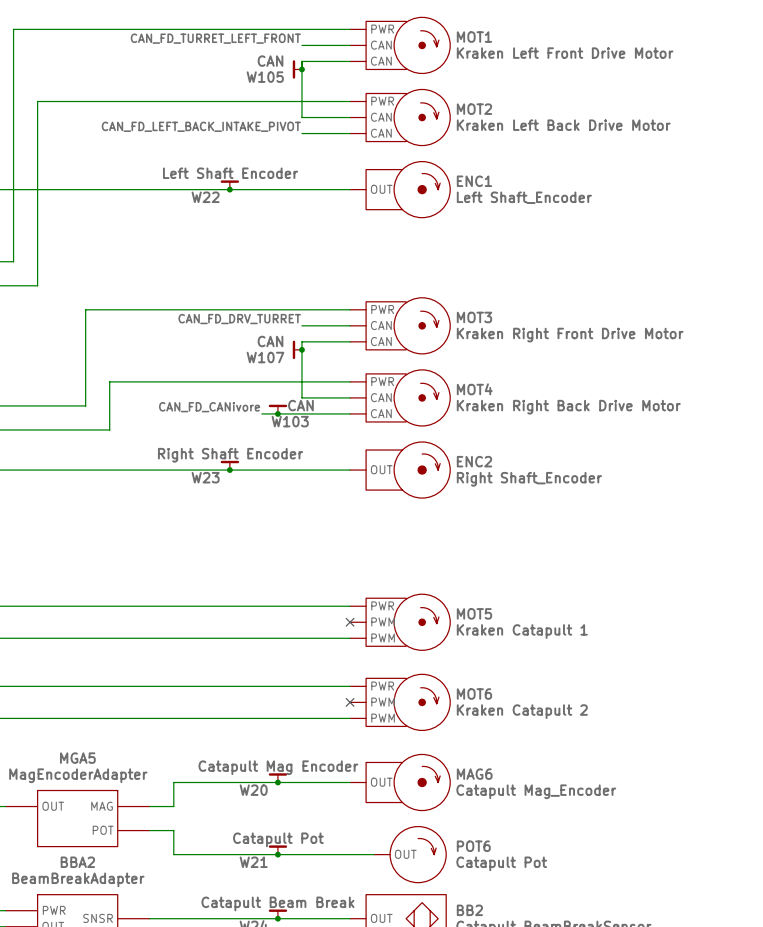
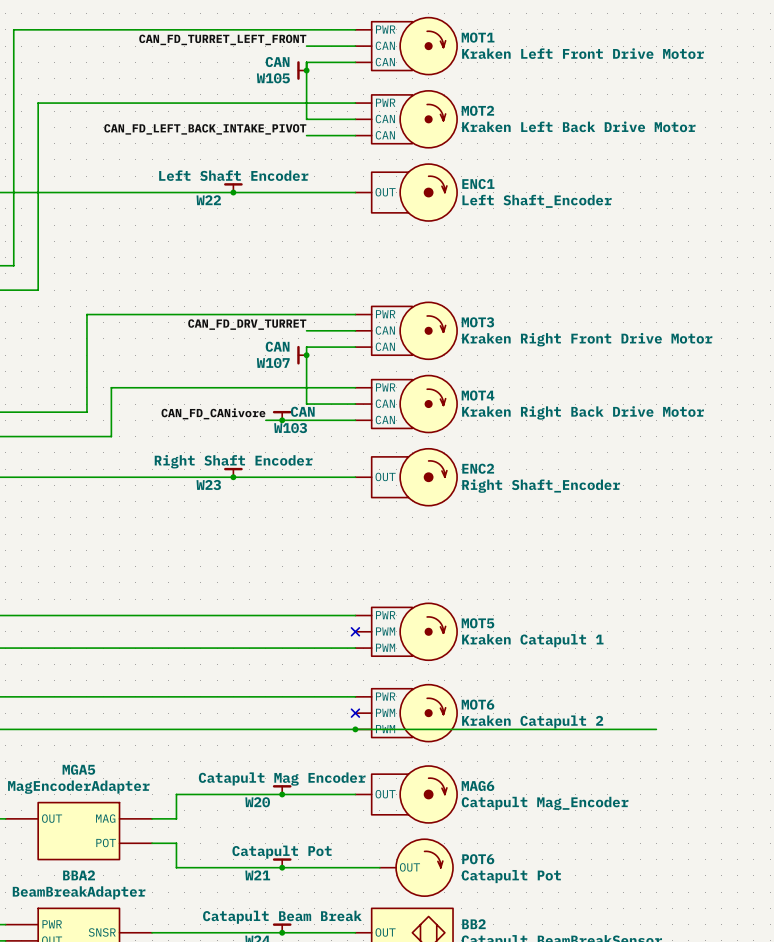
wire: none -> (355, 729) (656, 729)
junction: none -> (355, 729)

